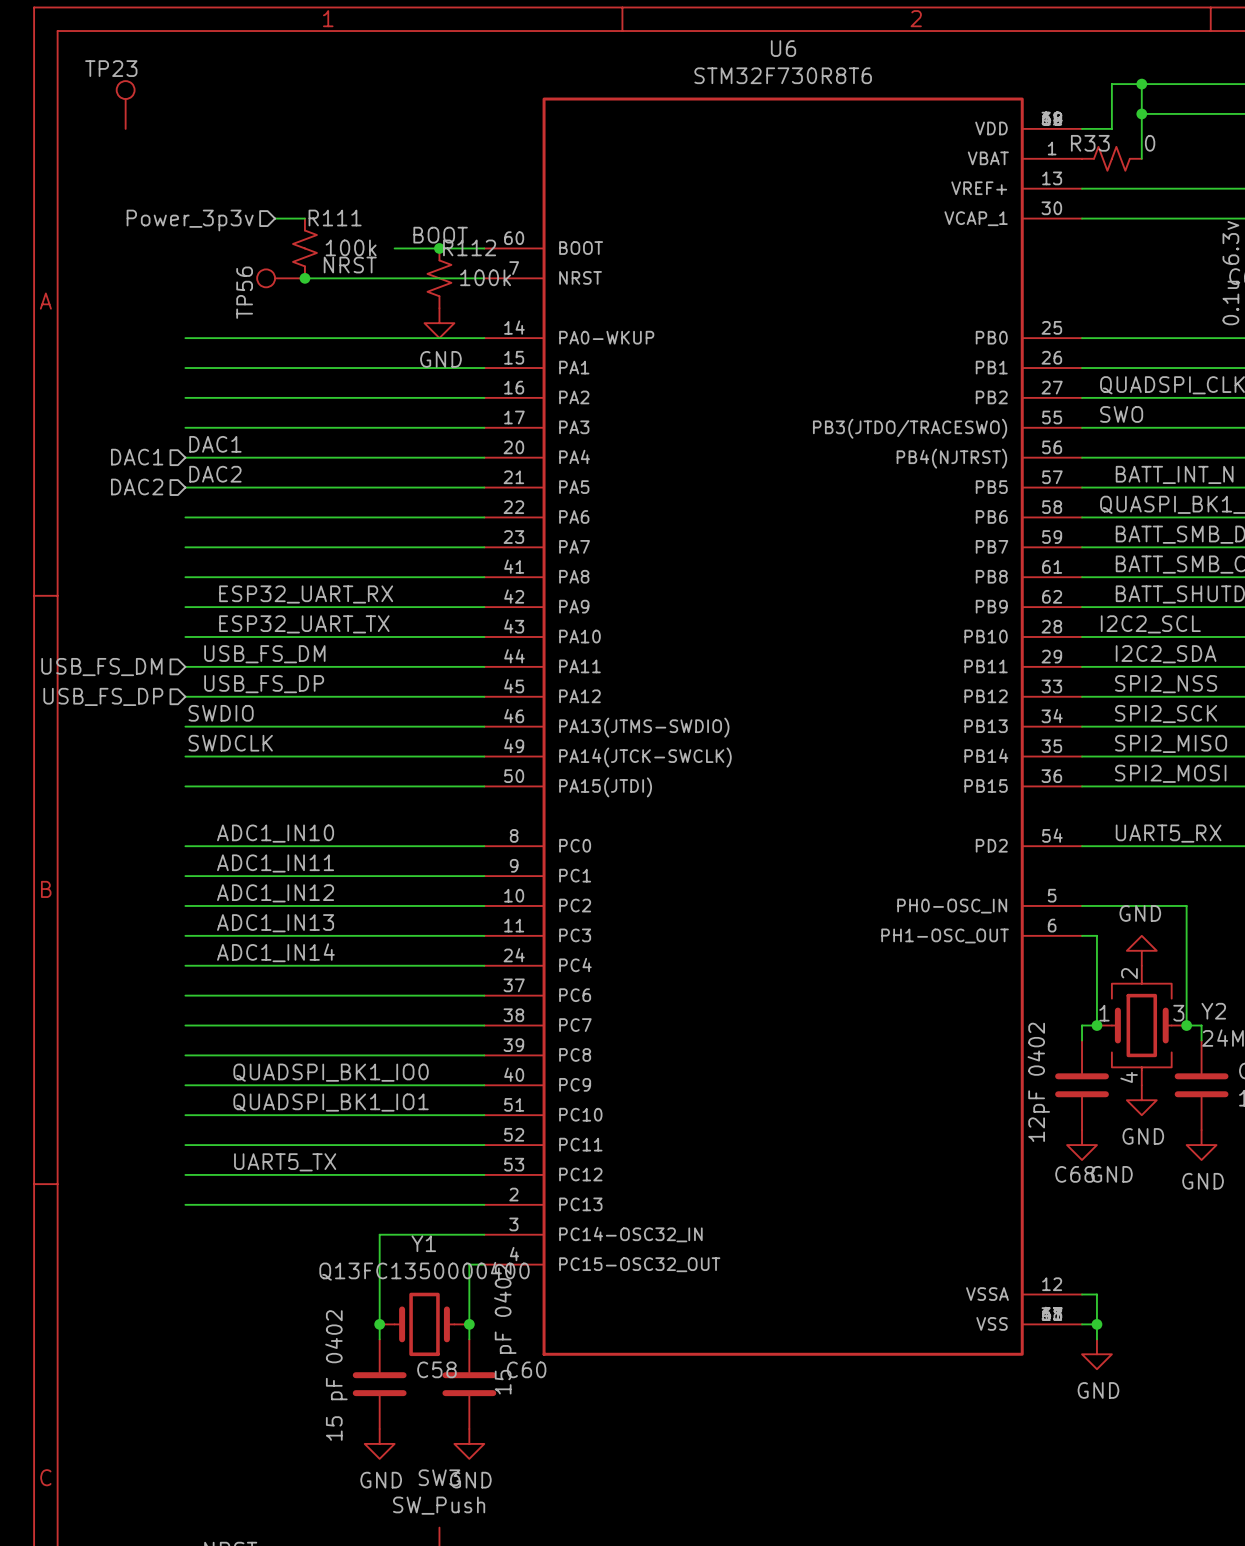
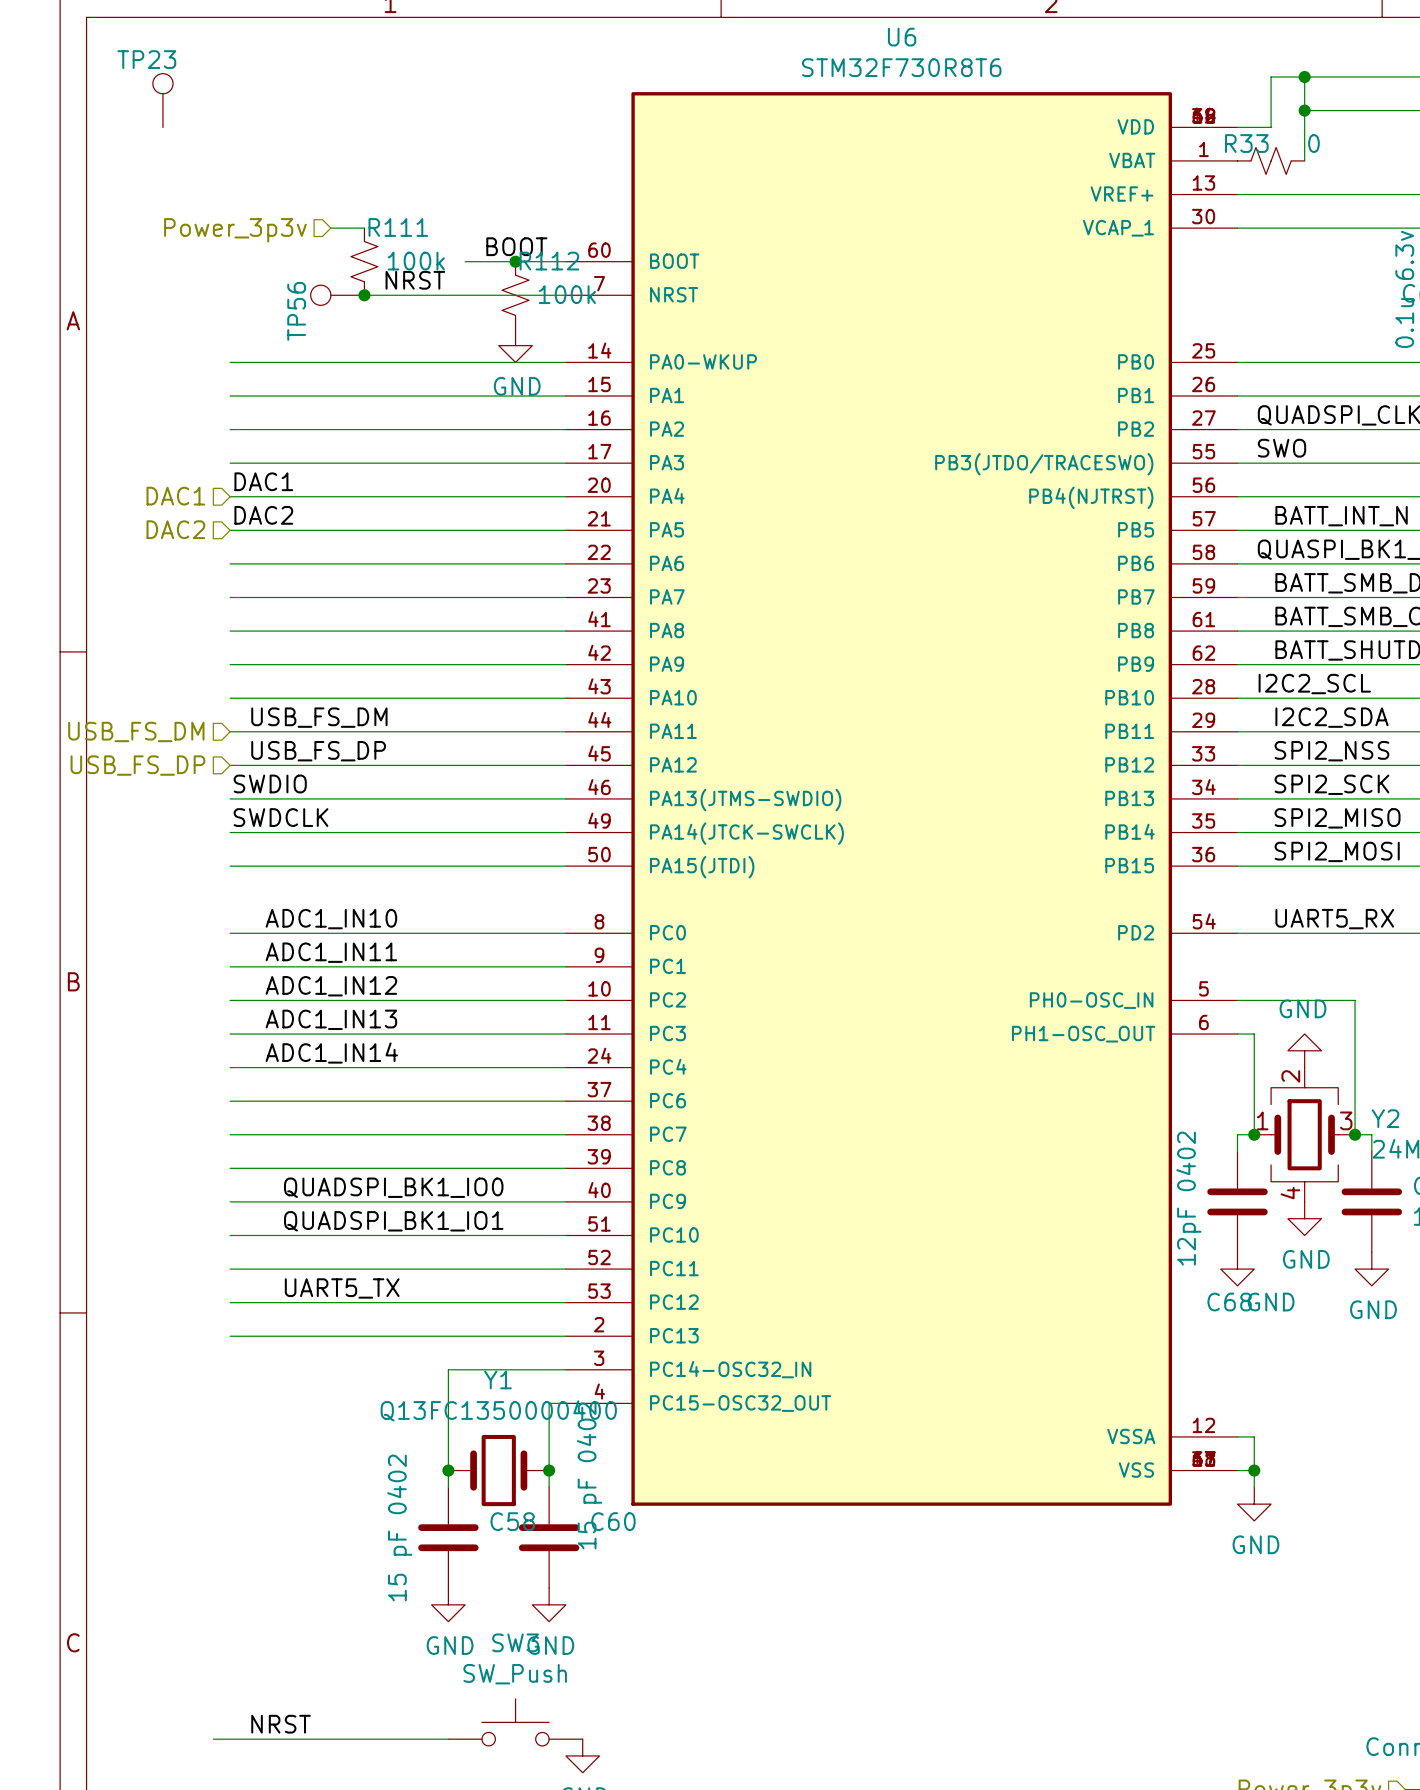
label: ESP32_UART_RX (306, 594) -> none
label: ESP32_UART_TX (304, 624) -> none

